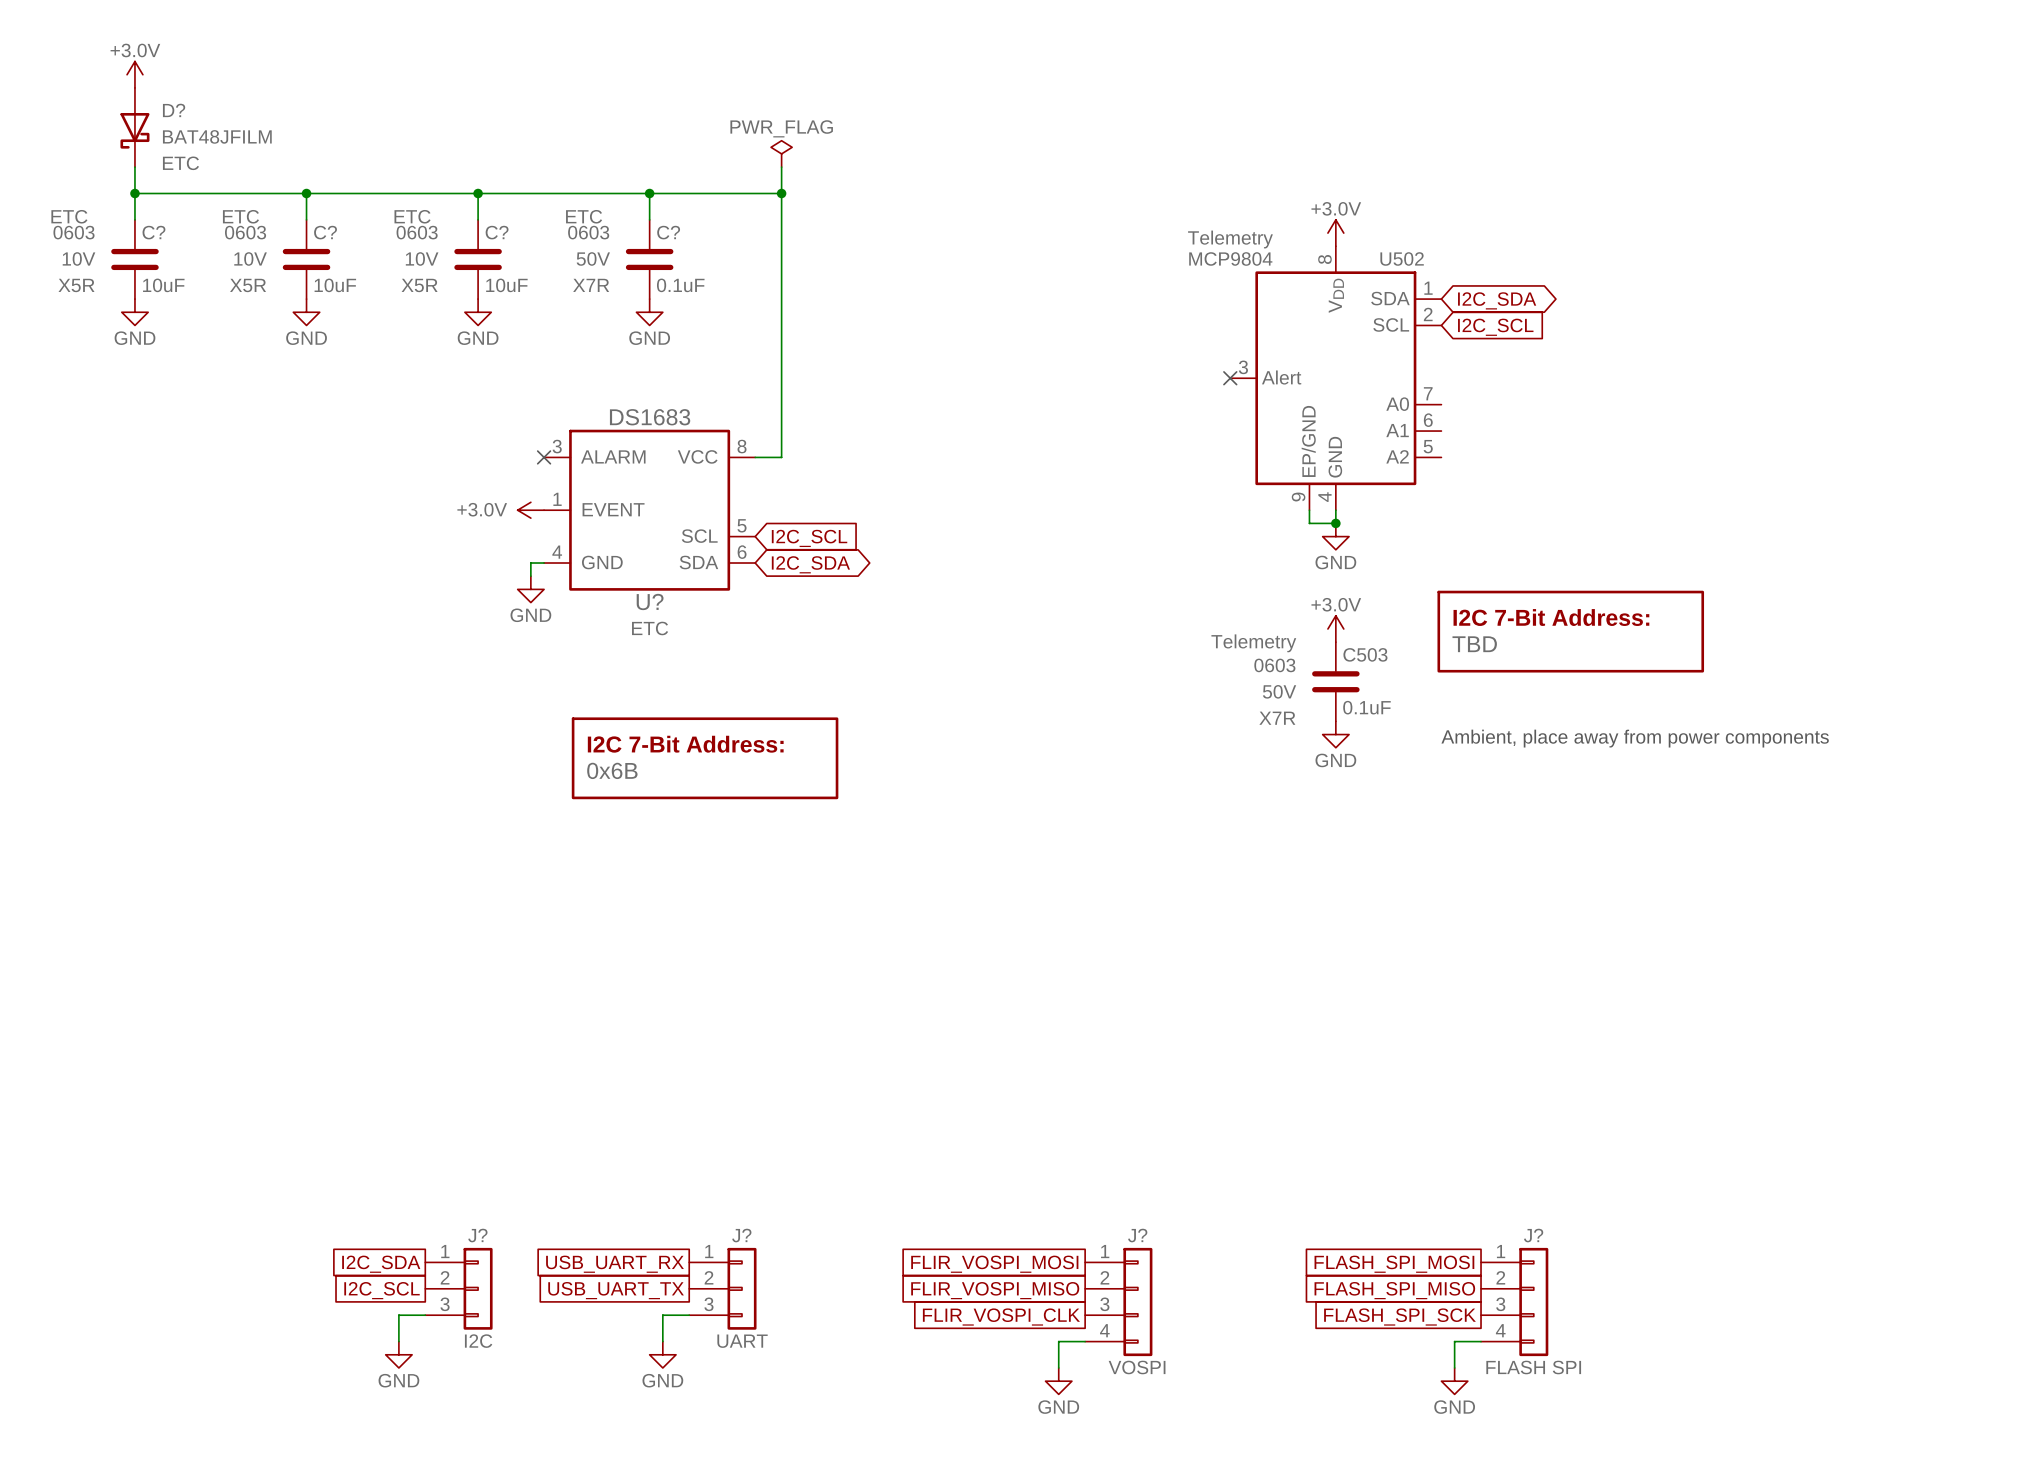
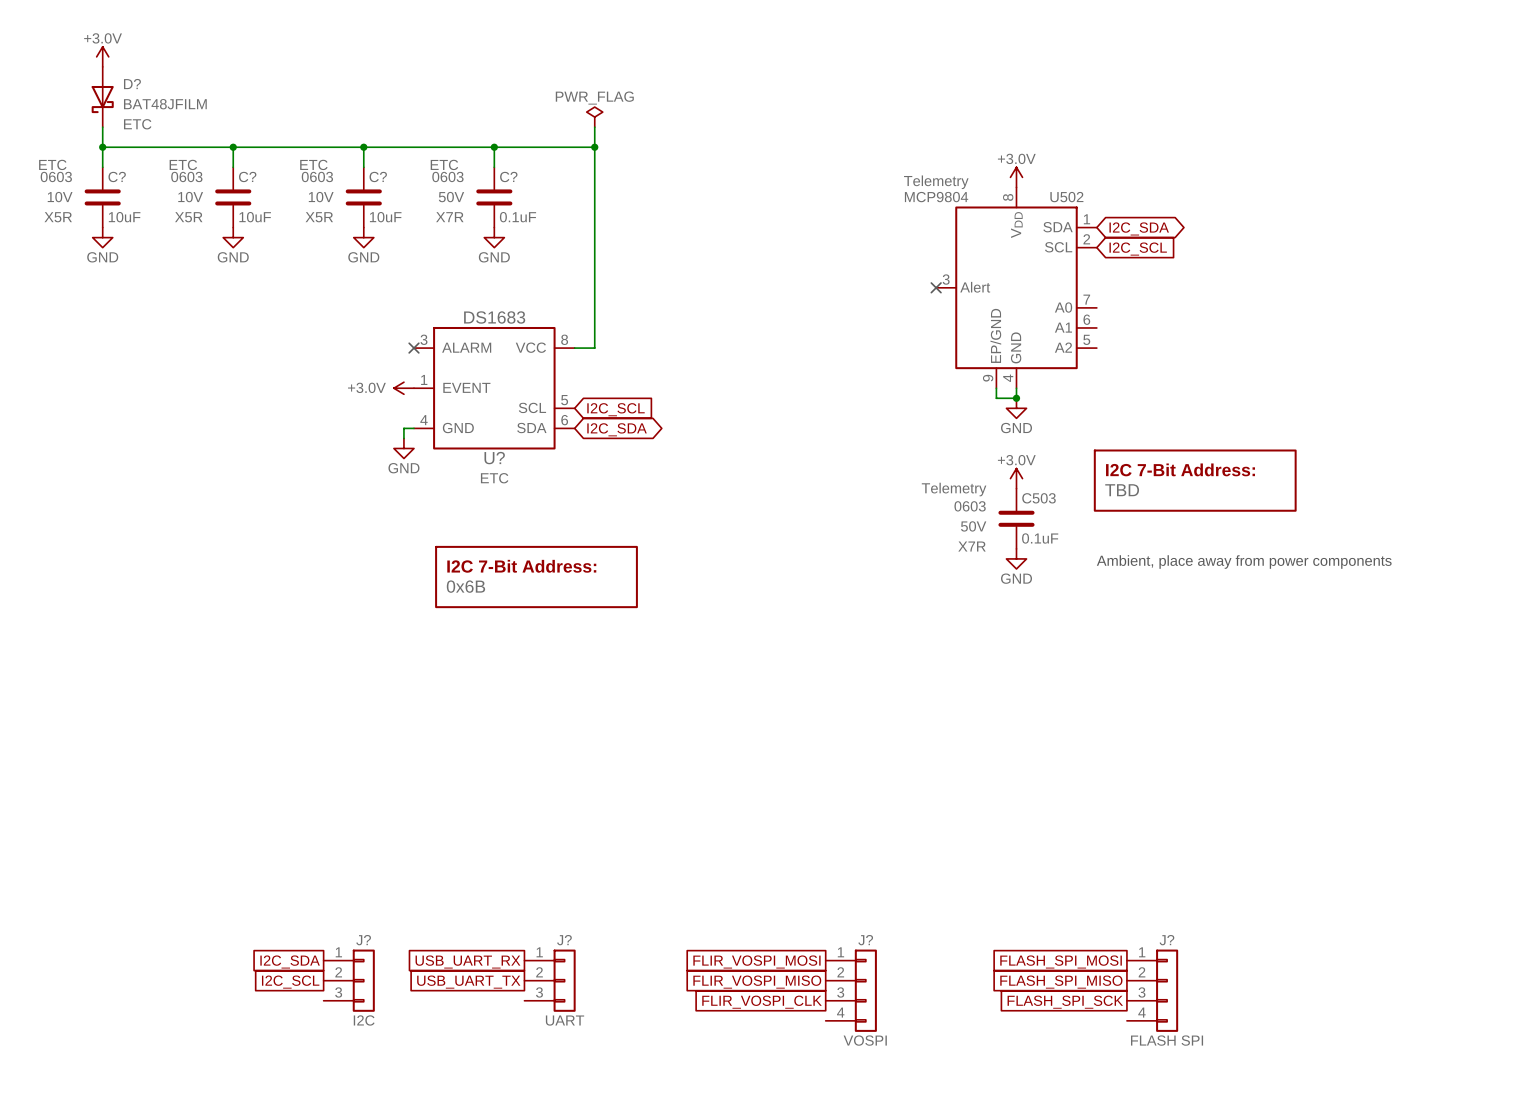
wire: (425, 1315) (398, 1315) (398, 1341) -> none
wire: (689, 1315) (662, 1315) (662, 1341) -> none
wire: (1085, 1341) (1058, 1341) (1058, 1367) -> none
wire: (1481, 1341) (1454, 1341) (1454, 1367) -> none
power symbol: GND (398, 1354) -> none
power symbol: GND (662, 1354) -> none
power symbol: GND (1058, 1381) -> none
power symbol: GND (1454, 1381) -> none

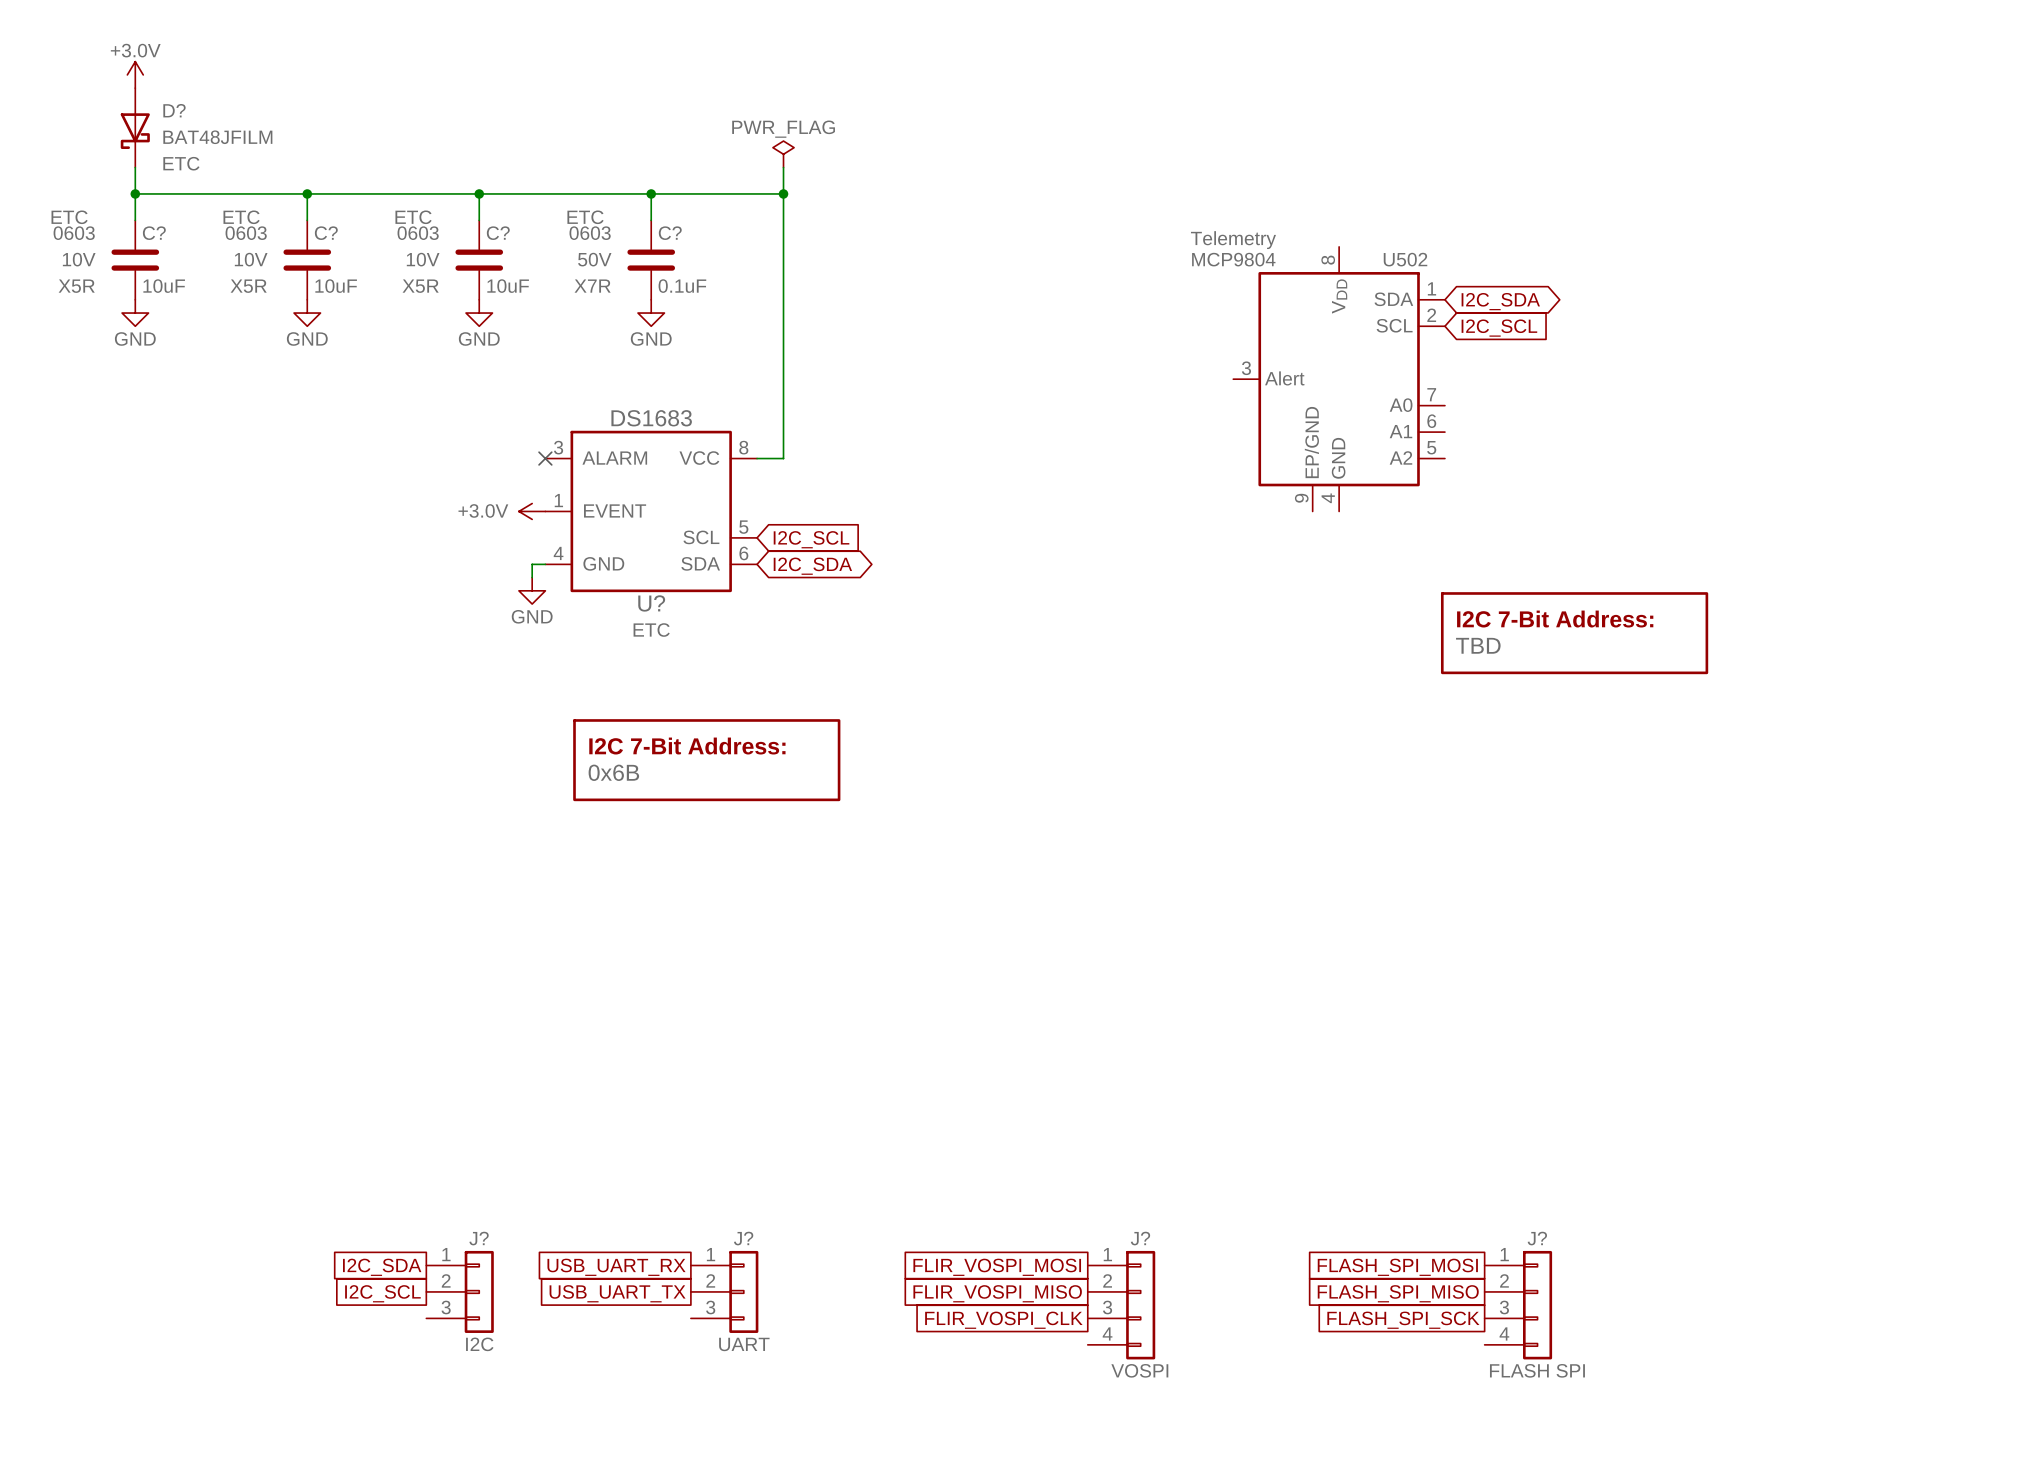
power symbol: +3.0V (1016, 177) -> none
no-connect mark: (936, 287) -> none
wire: (996, 388) (996, 398) (1016, 398) (1016, 388) -> none
junction: (1016, 398) -> none
power symbol: GND (1016, 408) -> none
power symbol: +3.0V (1016, 478) -> none
C503: 0.1uF (1016, 518) -> none
power symbol: GND (1016, 558) -> none
text: Ambient, place away from power components (1244, 562) -> none

